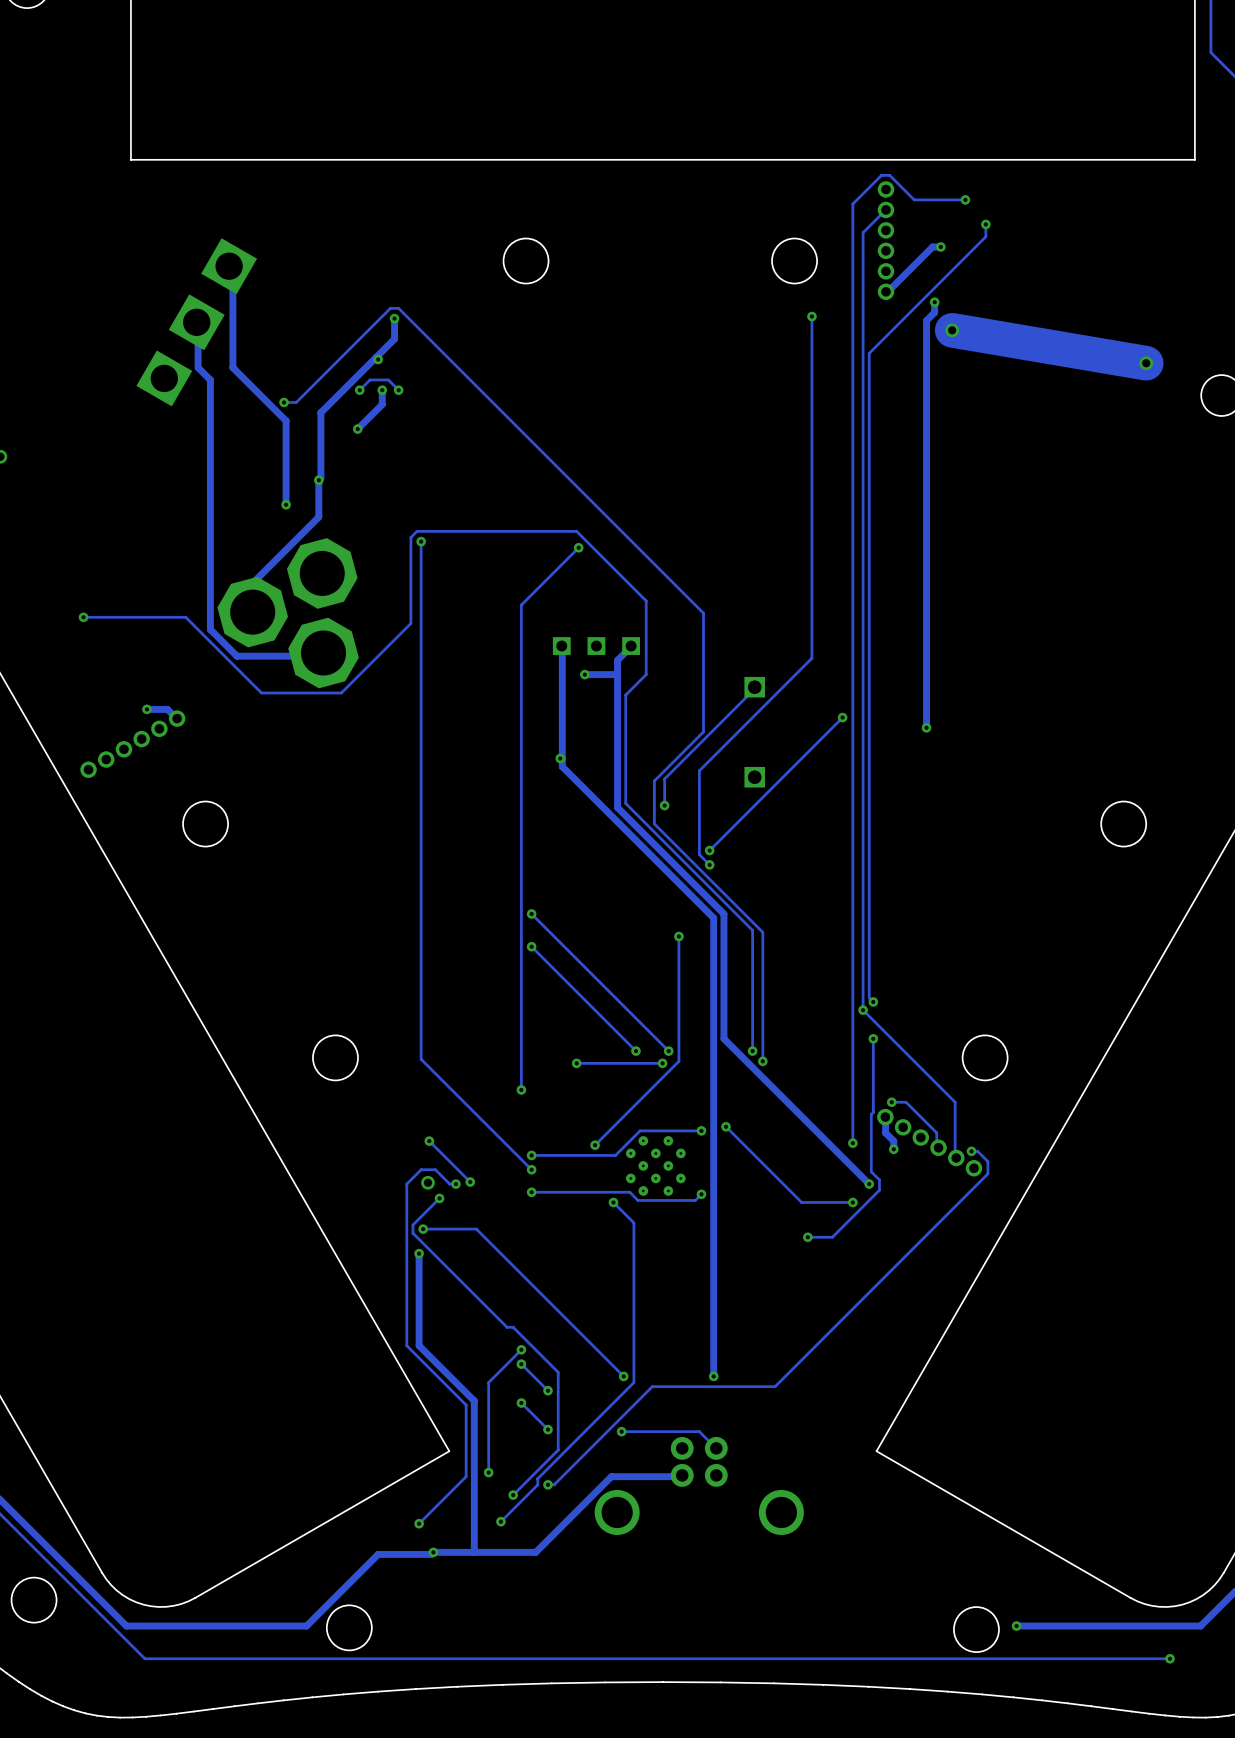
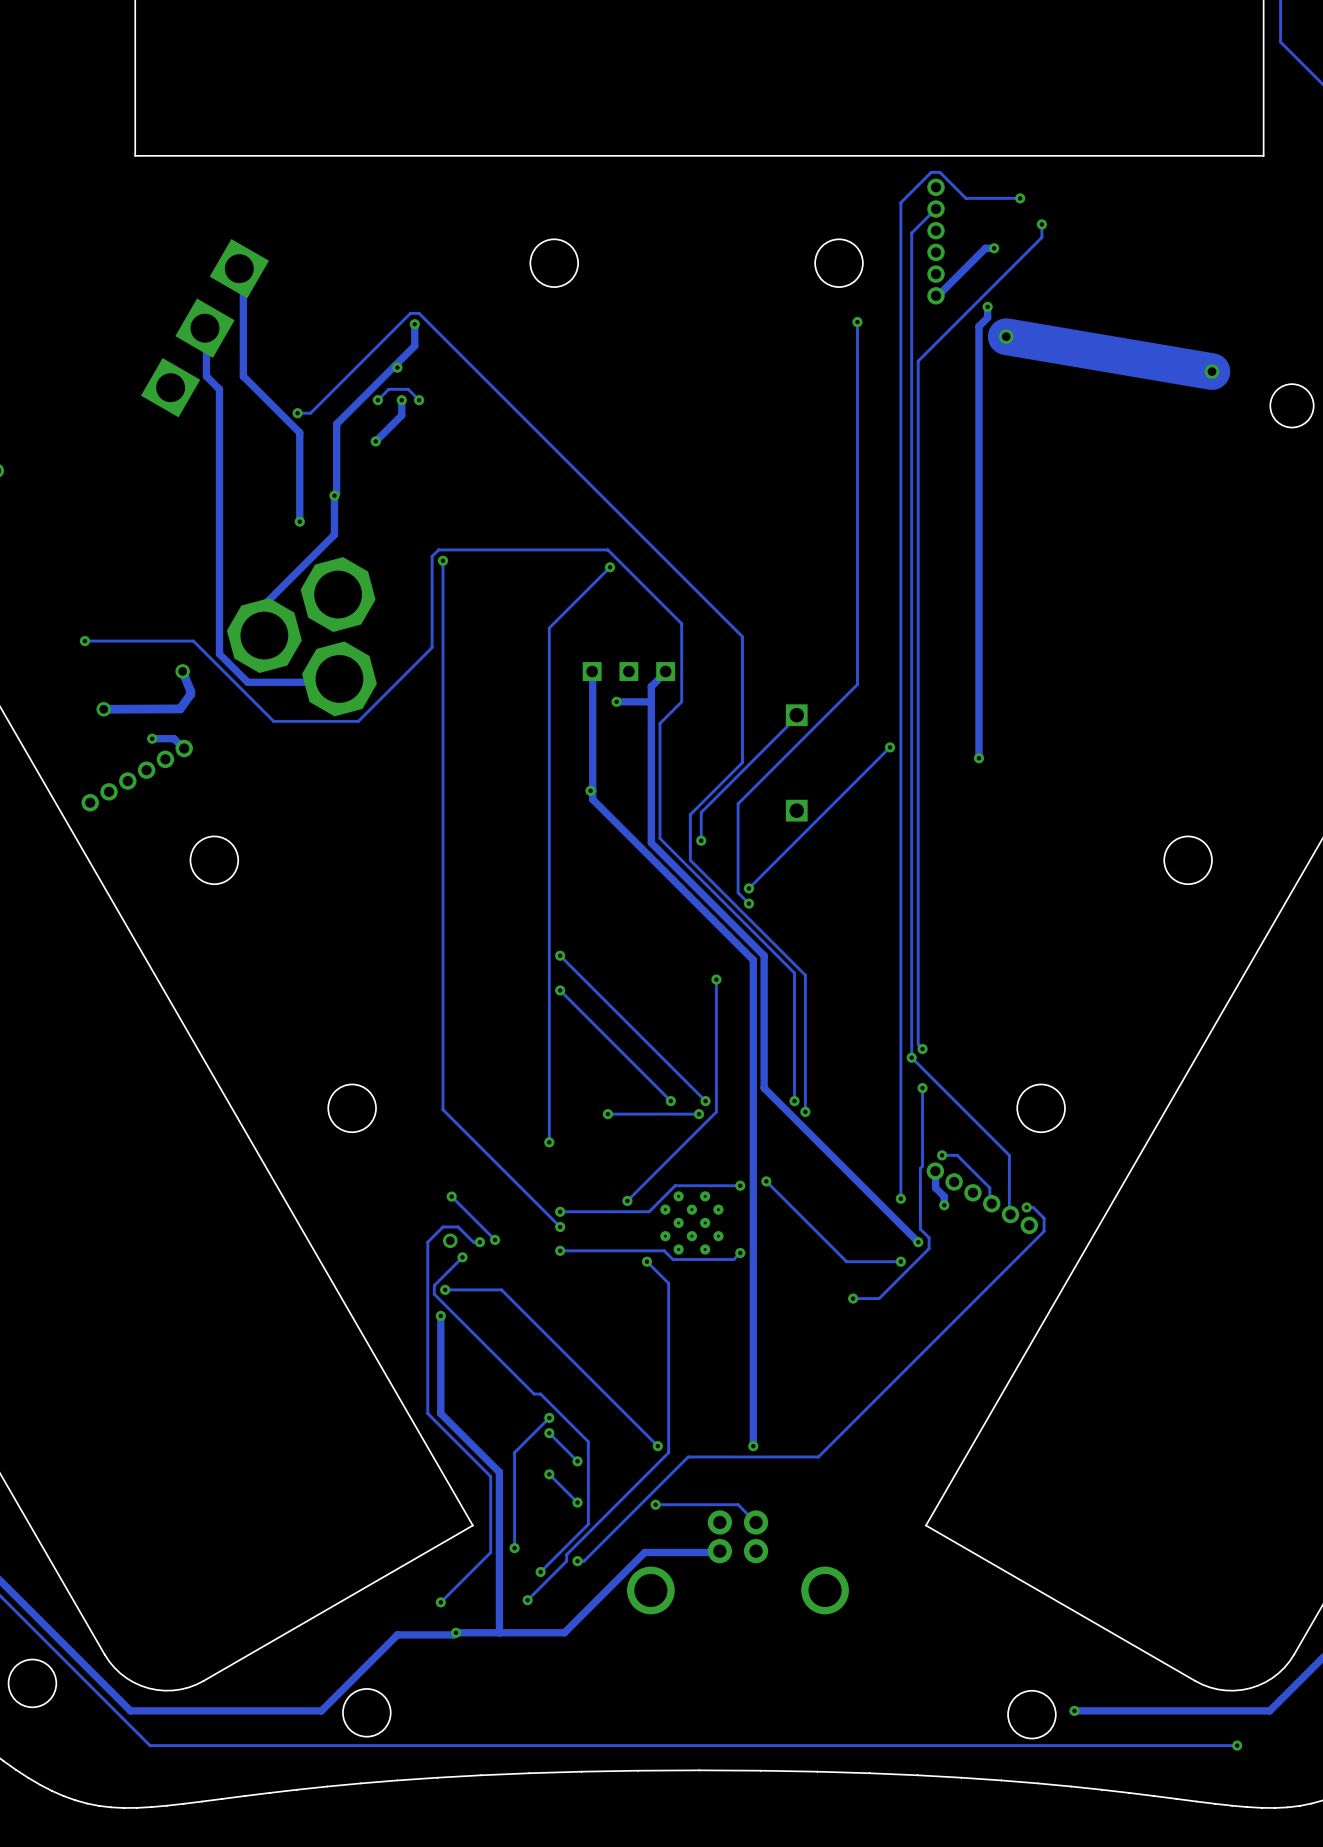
track: none -> (182, 671) (190, 694) (180, 708) (103, 709)
via: none -> (182, 671)
via: none -> (103, 709)

